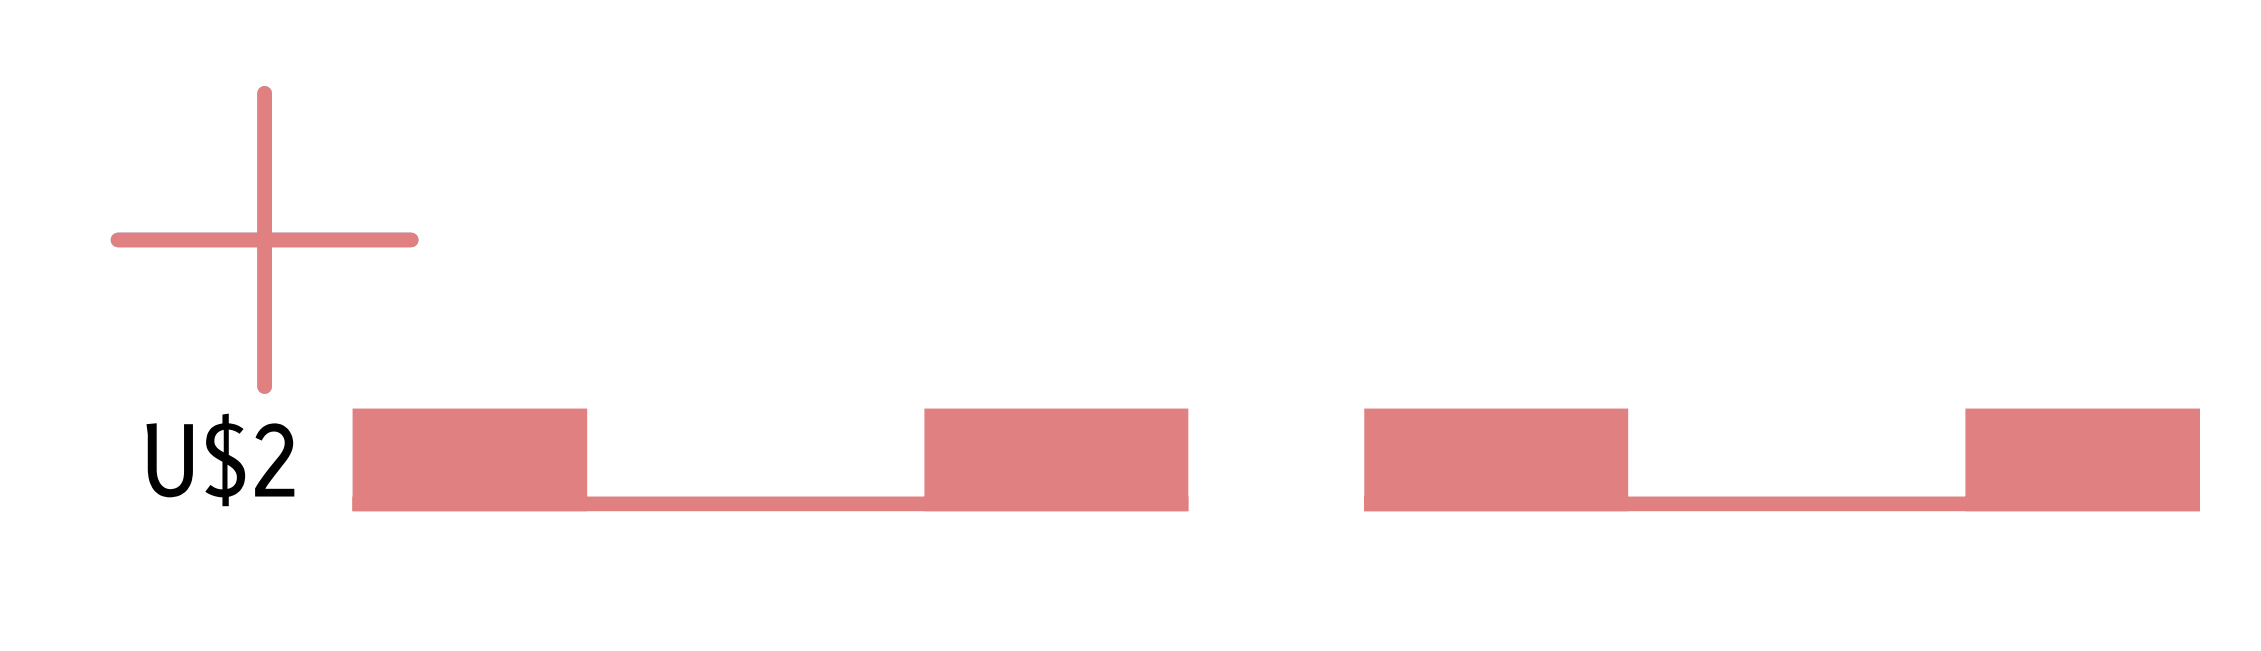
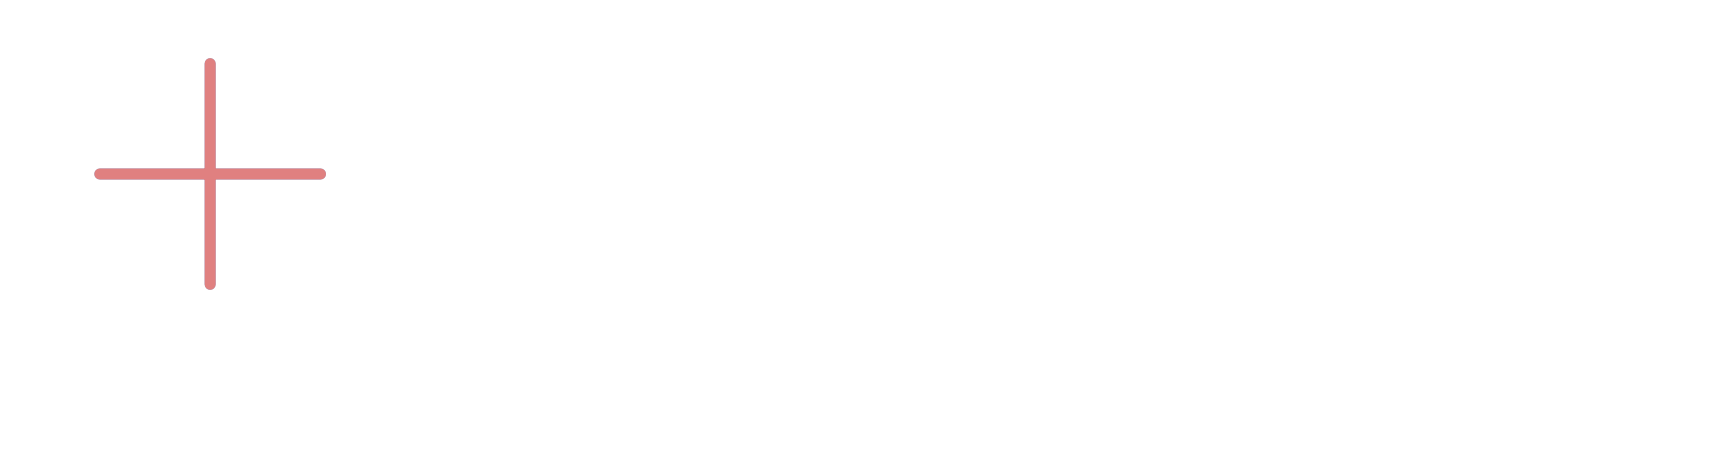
U$2: (1276, 459) -> none

